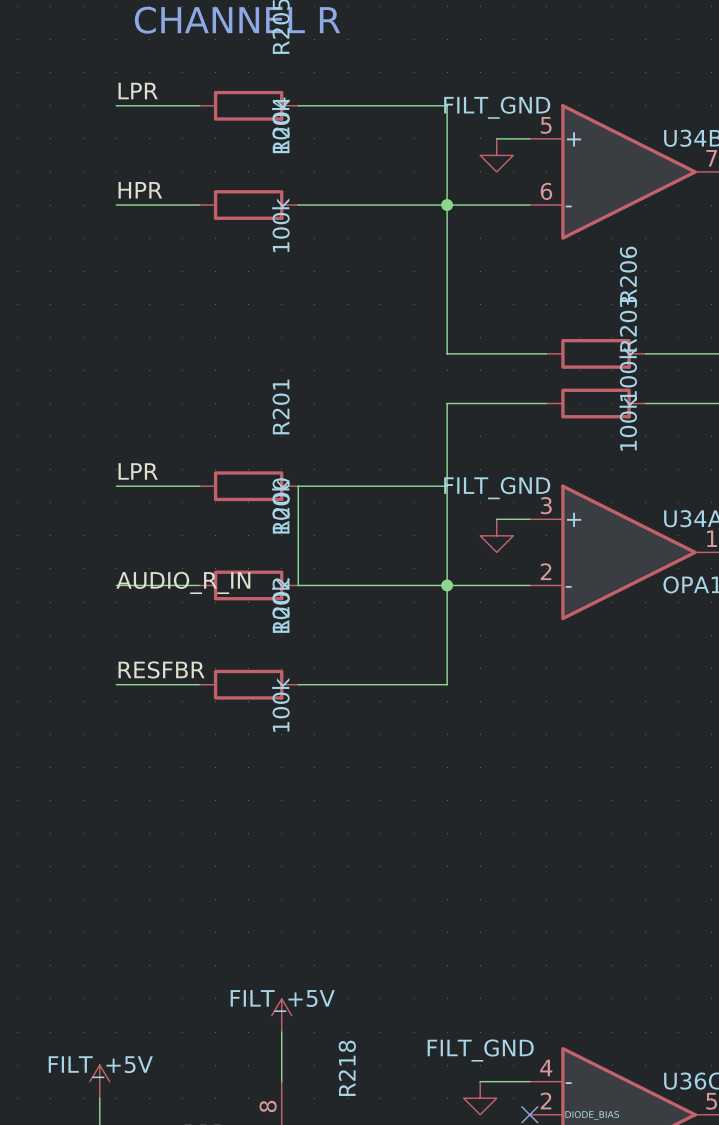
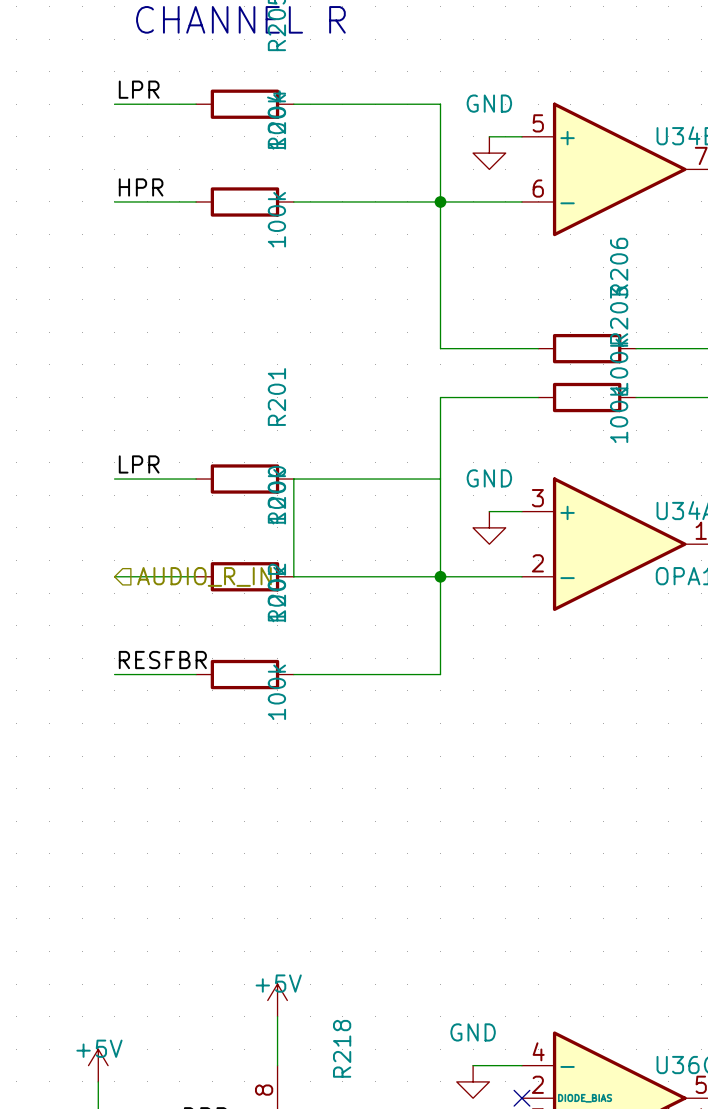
power symbol: FILT_GND (496, 155) -> GND (489, 153)
power symbol: FILT_GND (496, 535) -> GND (489, 527)
label: AUDIO_R_IN (183, 582) -> none
hierarchical label: none -> AUDIO_R_IN (204, 576)
power symbol: FILT_+5V (281, 1015) -> +5V (277, 1000)
power symbol: FILT_+5V (99, 1081) -> +5V (98, 1065)
power symbol: FILT_GND (480, 1098) -> GND (473, 1081)

